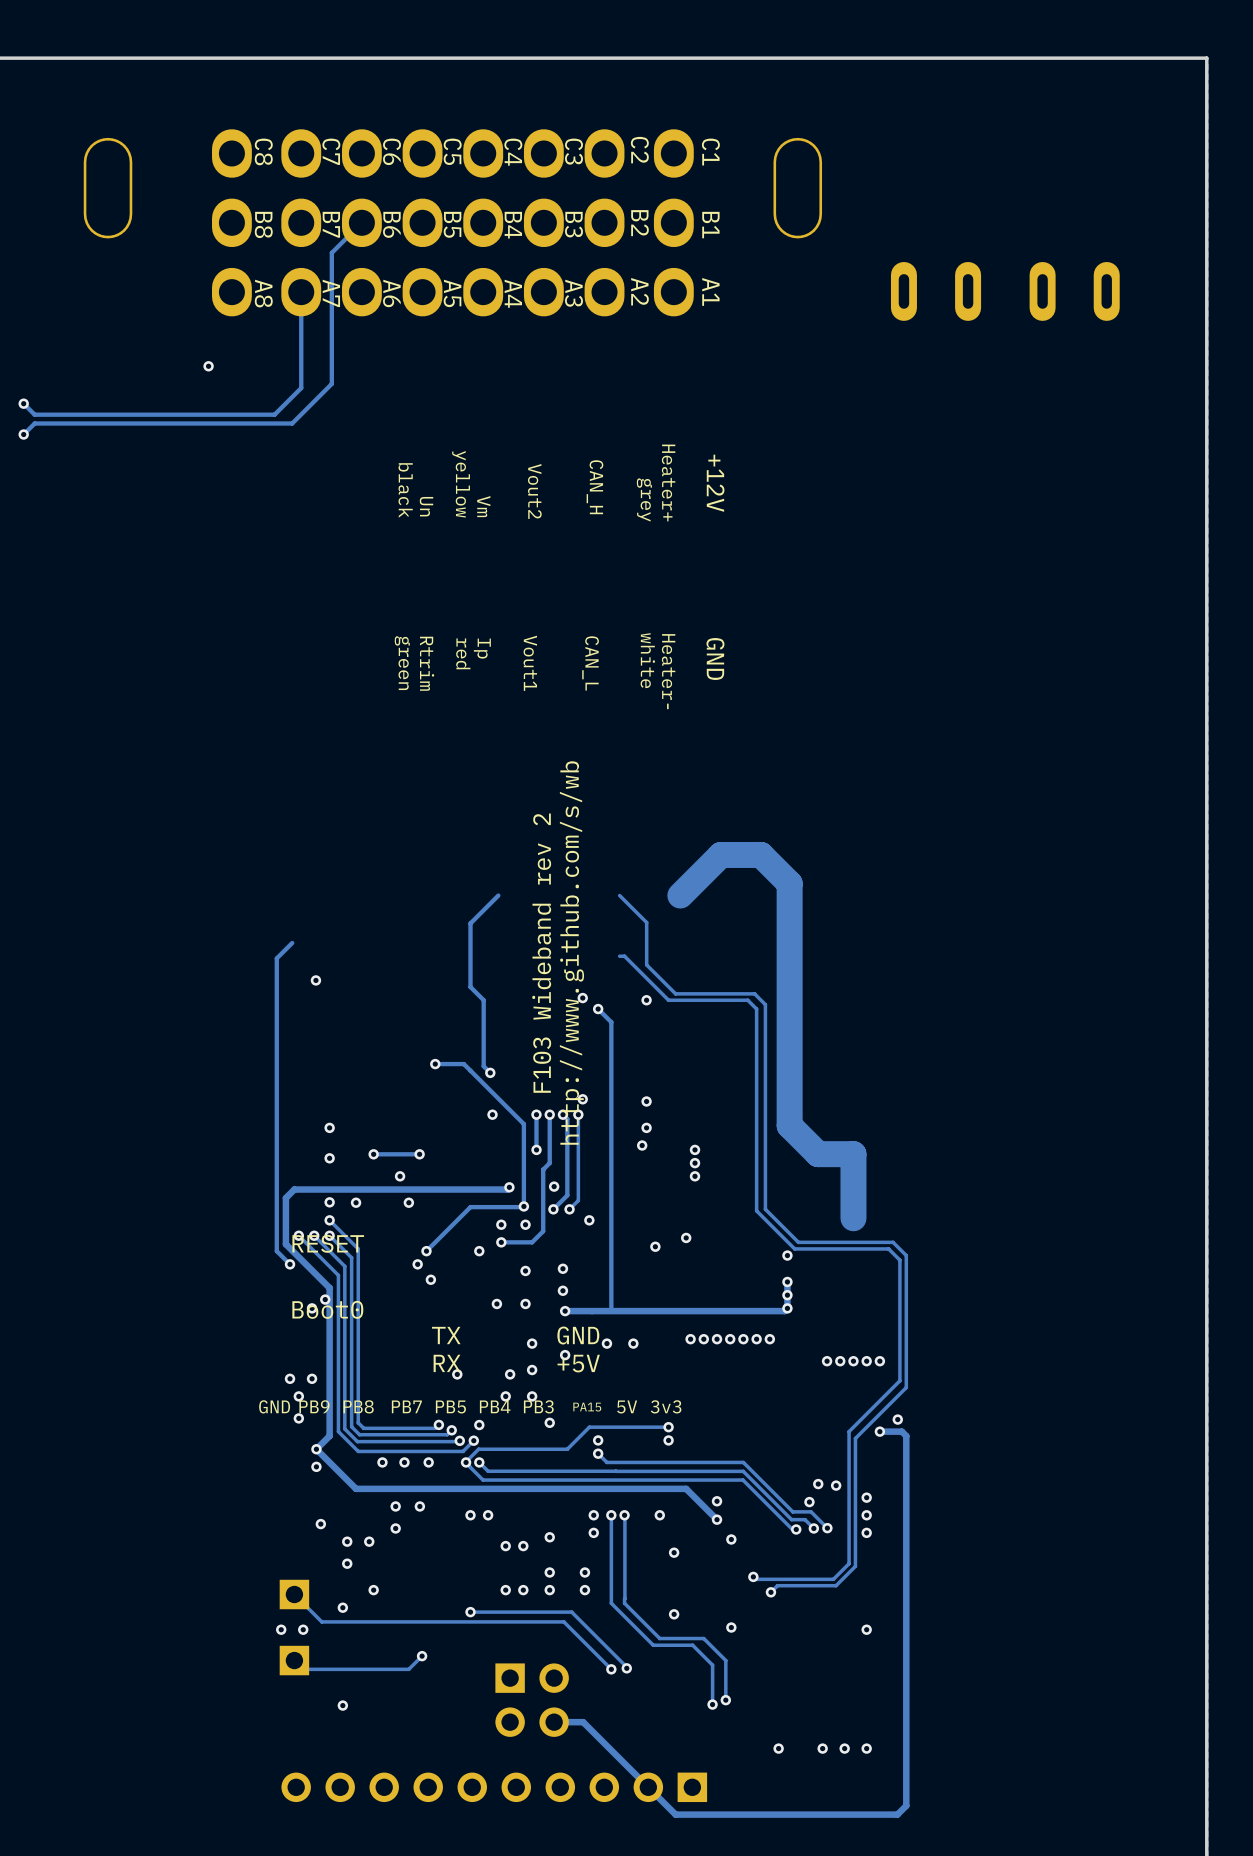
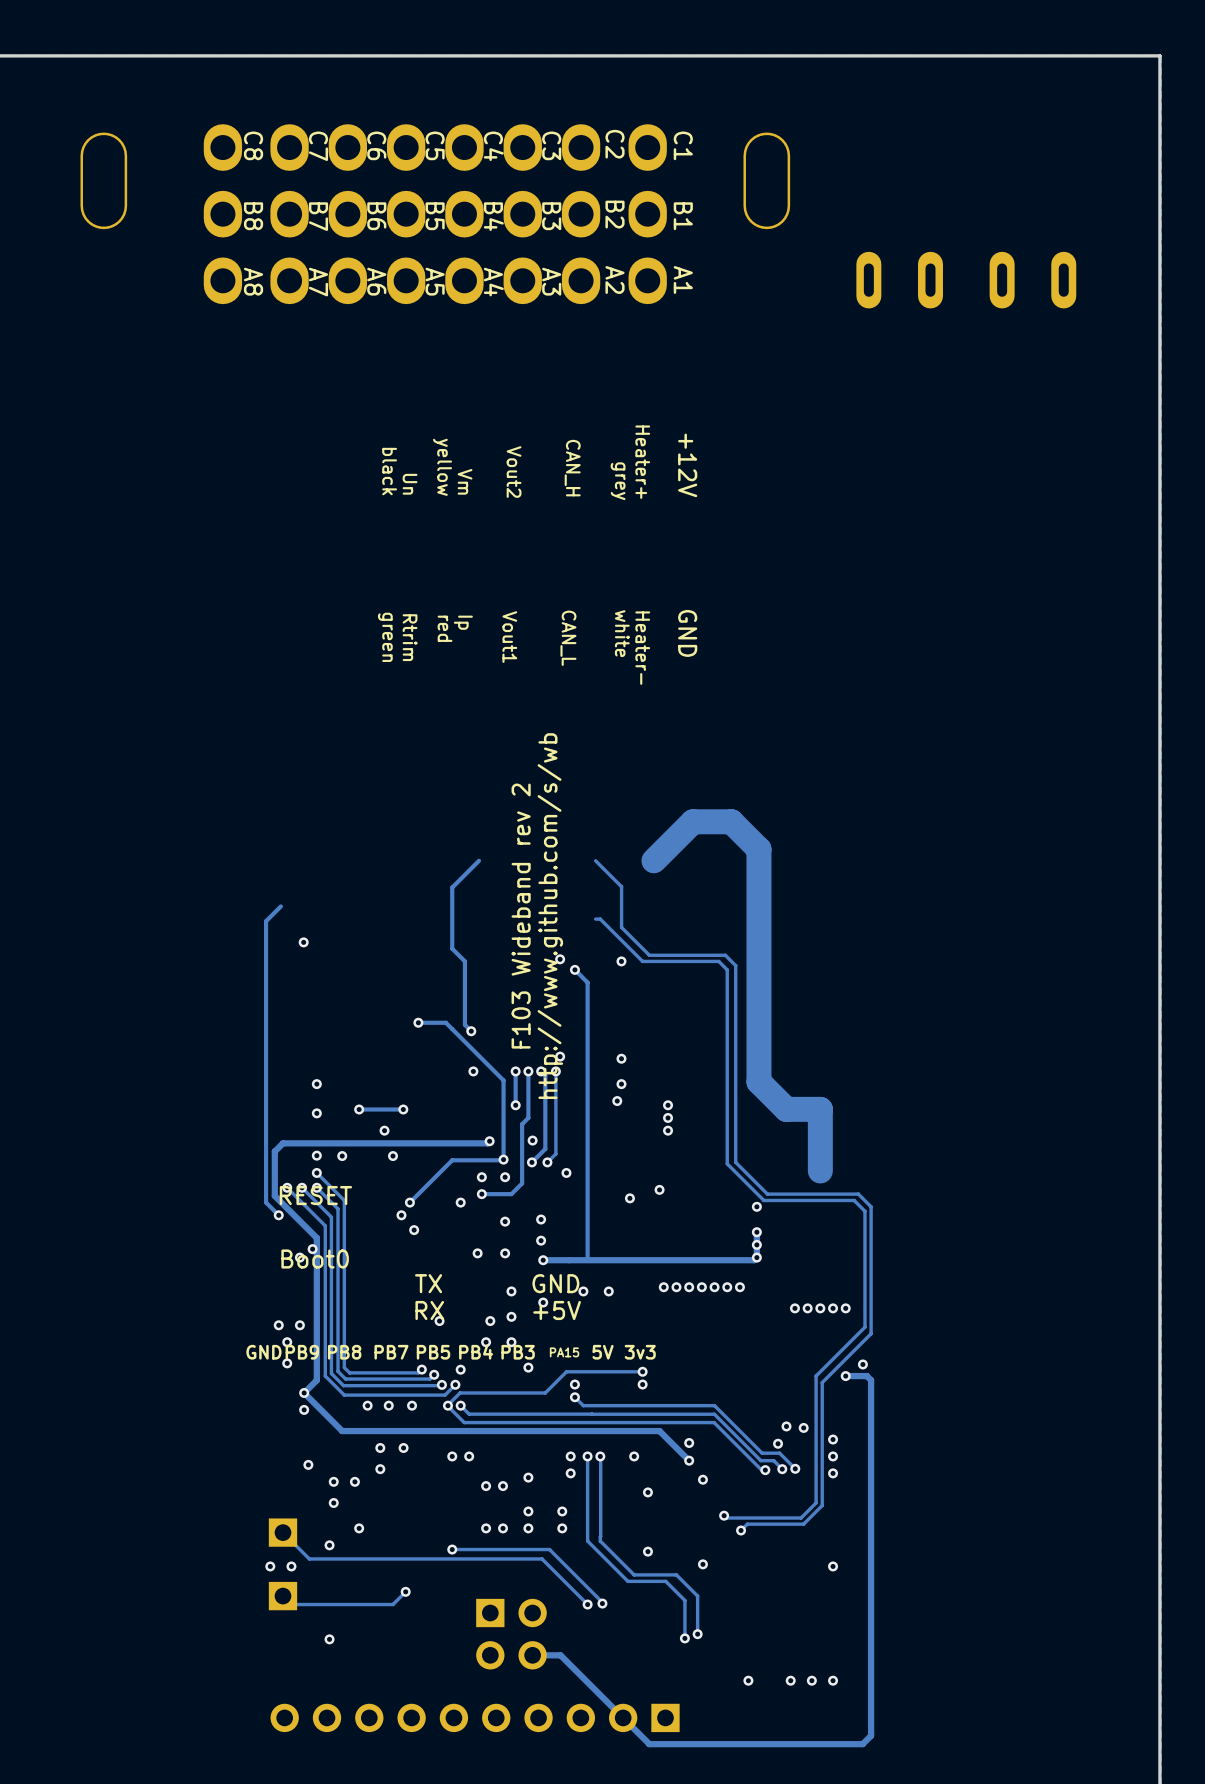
track: (361, 222) (331, 252) (331, 383) (292, 423) (34, 423) (23, 434) -> none
track: (301, 292) (301, 388) (274, 414) (34, 414) (23, 403) -> none
via: (208, 366) -> none
via: (23, 403) -> none
via: (23, 434) -> none

